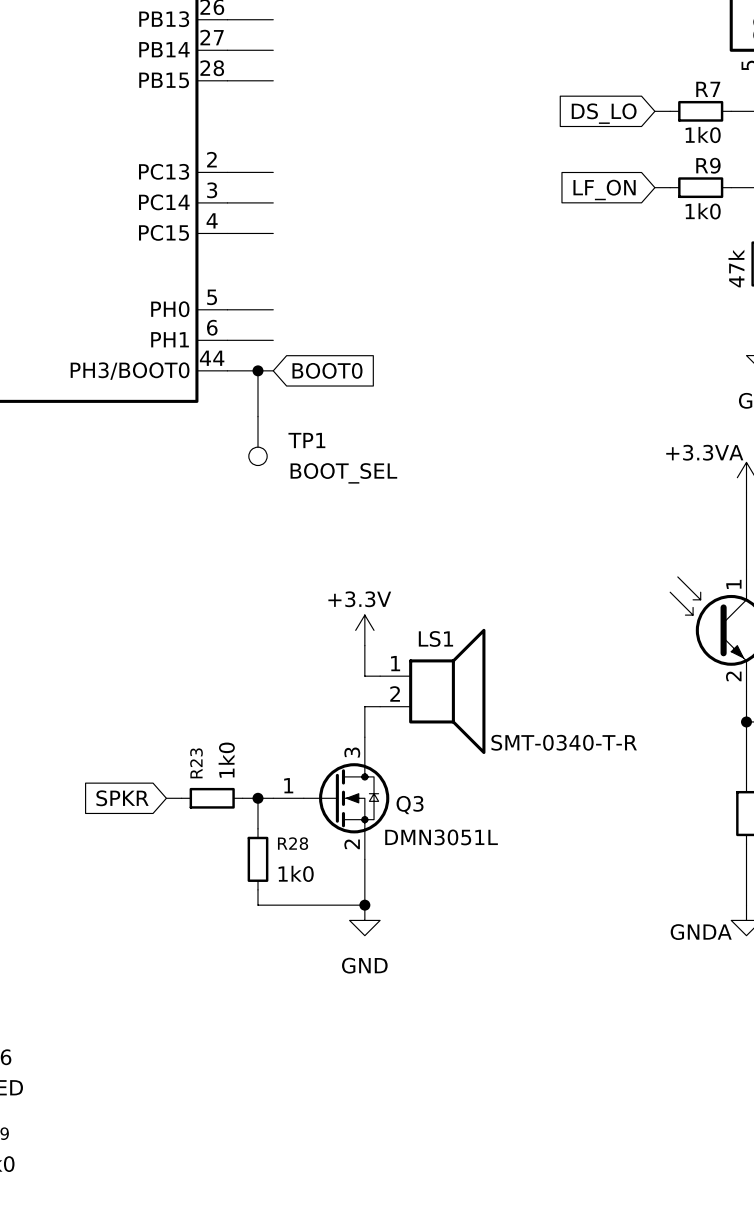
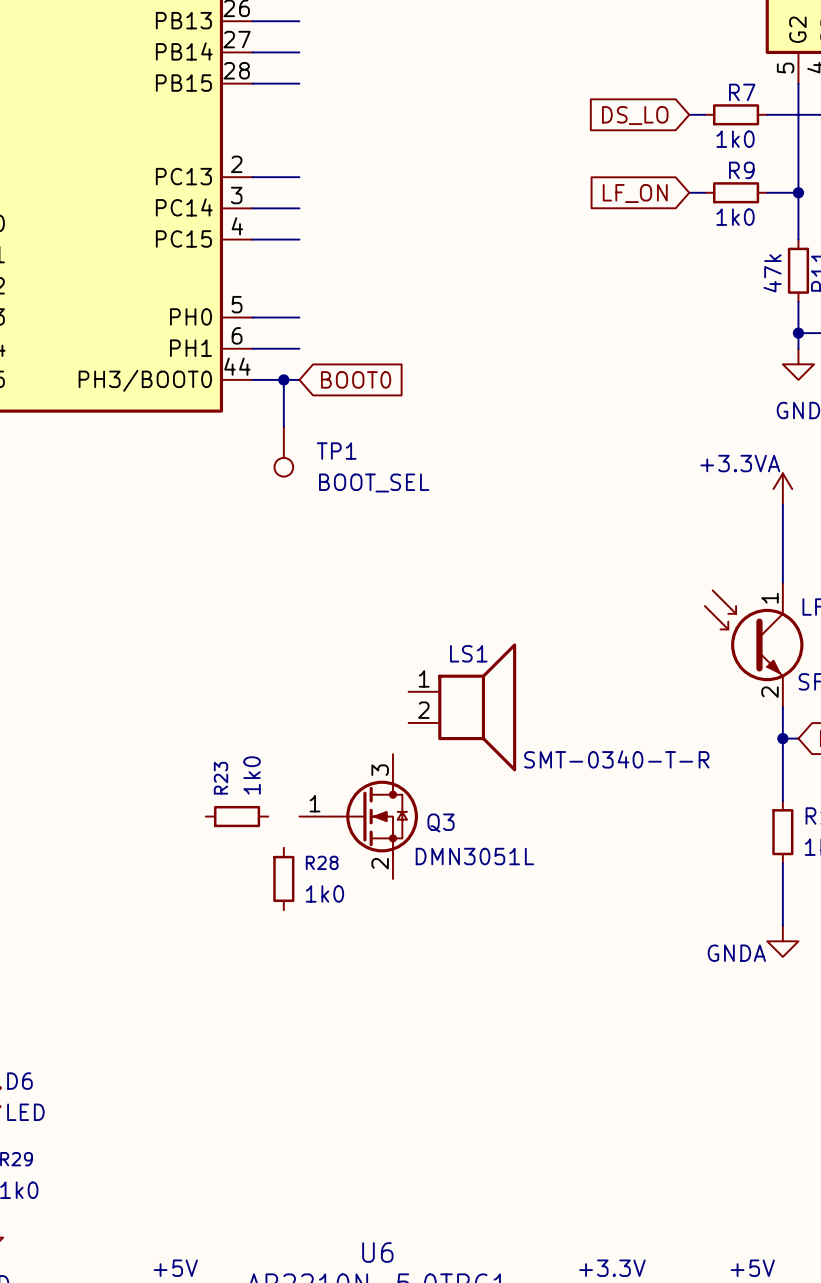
power symbol: +3.3V (364, 630) -> none
wire: (364, 645) (364, 676) (380, 676) -> none
wire: (380, 706) (364, 706) (364, 737) -> none
global label: SPKR (122, 798) -> none
wire: (166, 798) (181, 798) -> none
wire: (242, 798) (273, 798) -> none
wire: (257, 798) (257, 828) -> none
junction: (257, 798) -> none
wire: (364, 859) (364, 905) (257, 905) (257, 889) -> none
junction: (364, 905) -> none
power symbol: GND (364, 920) -> none

